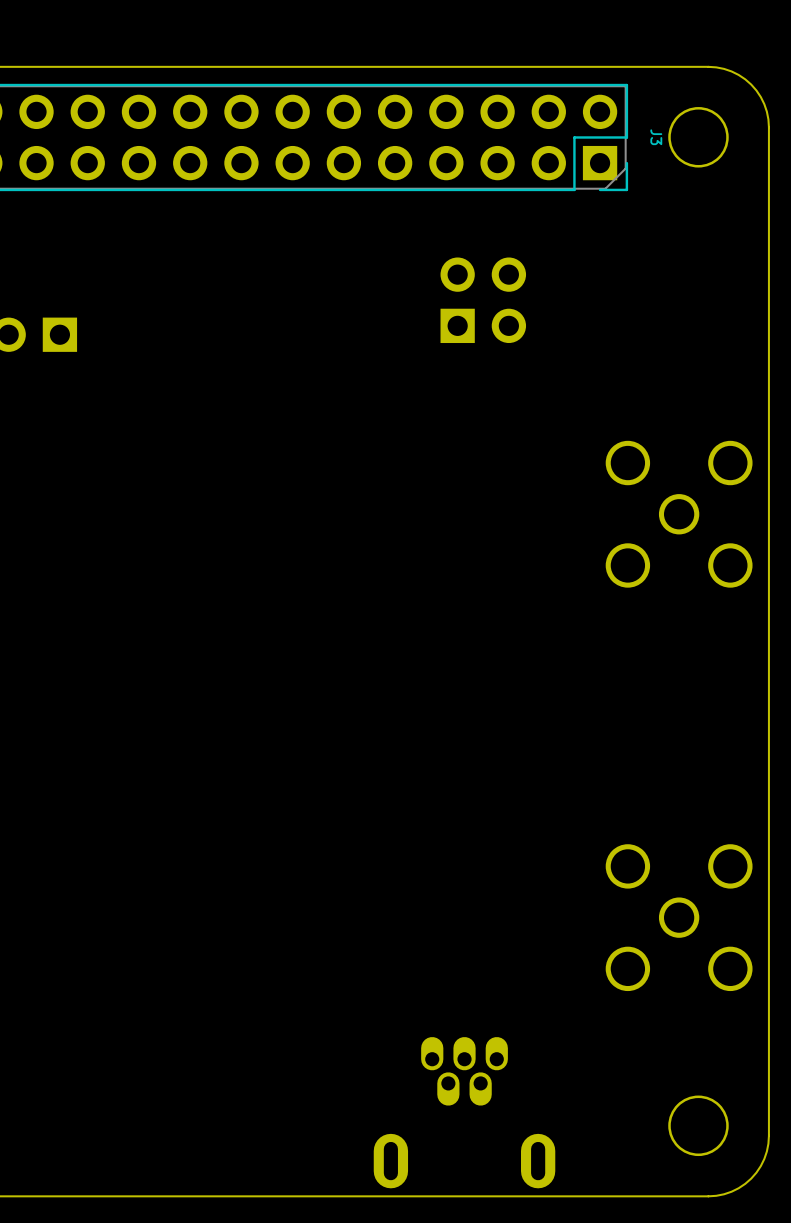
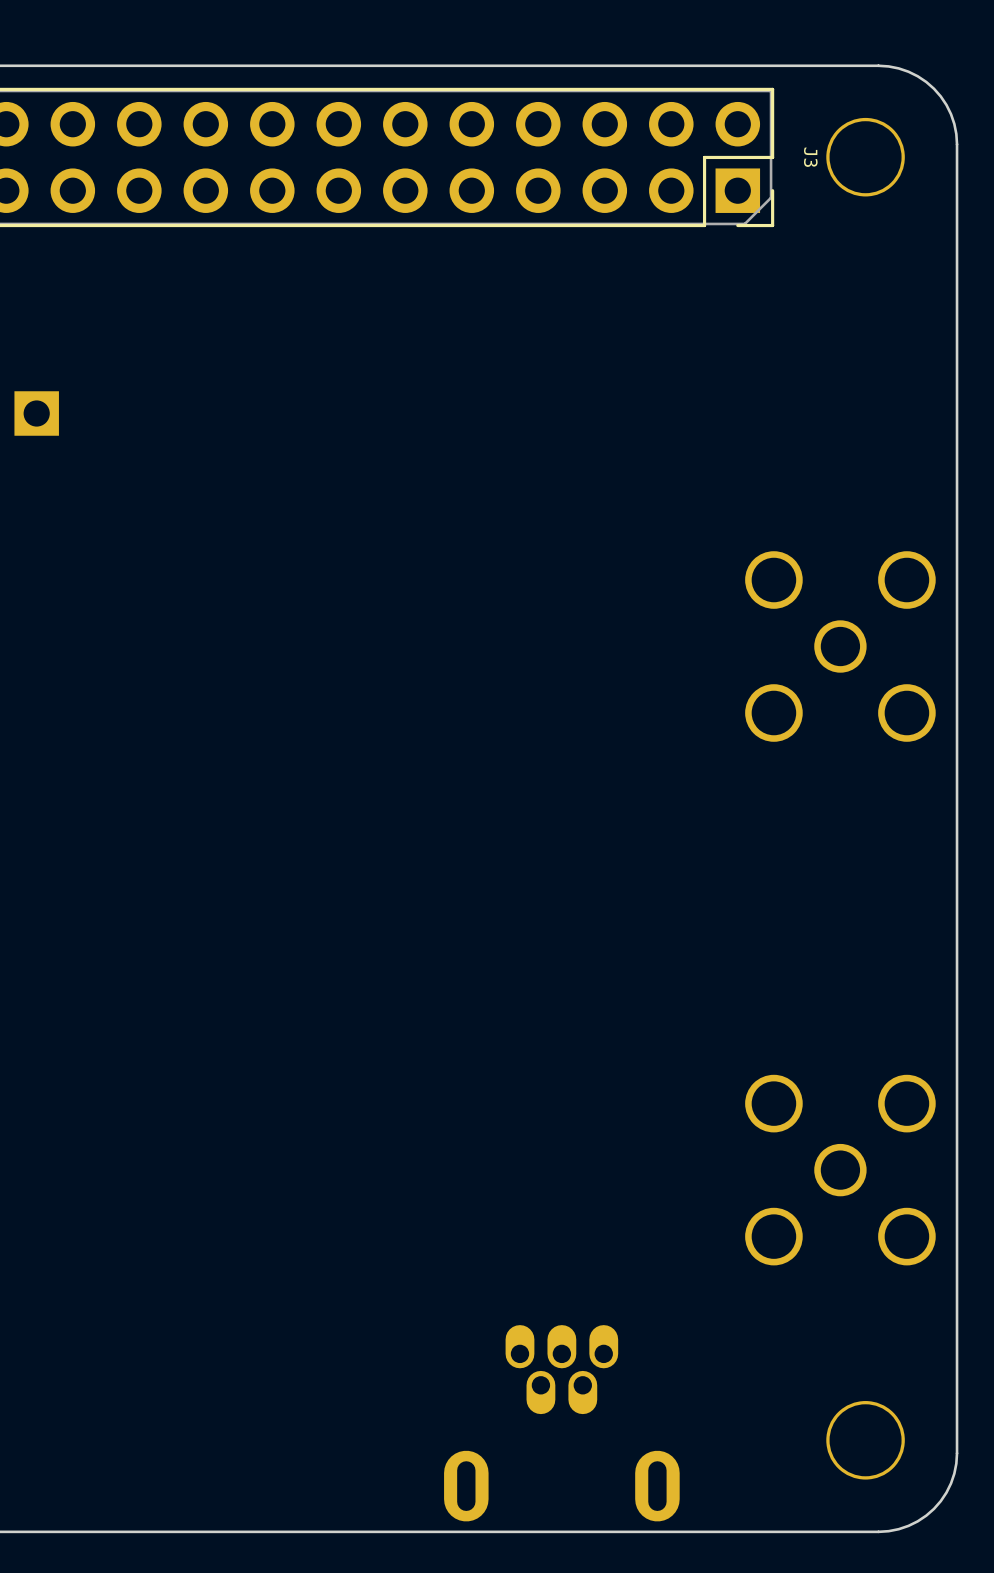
part: (483, 300) -> none

